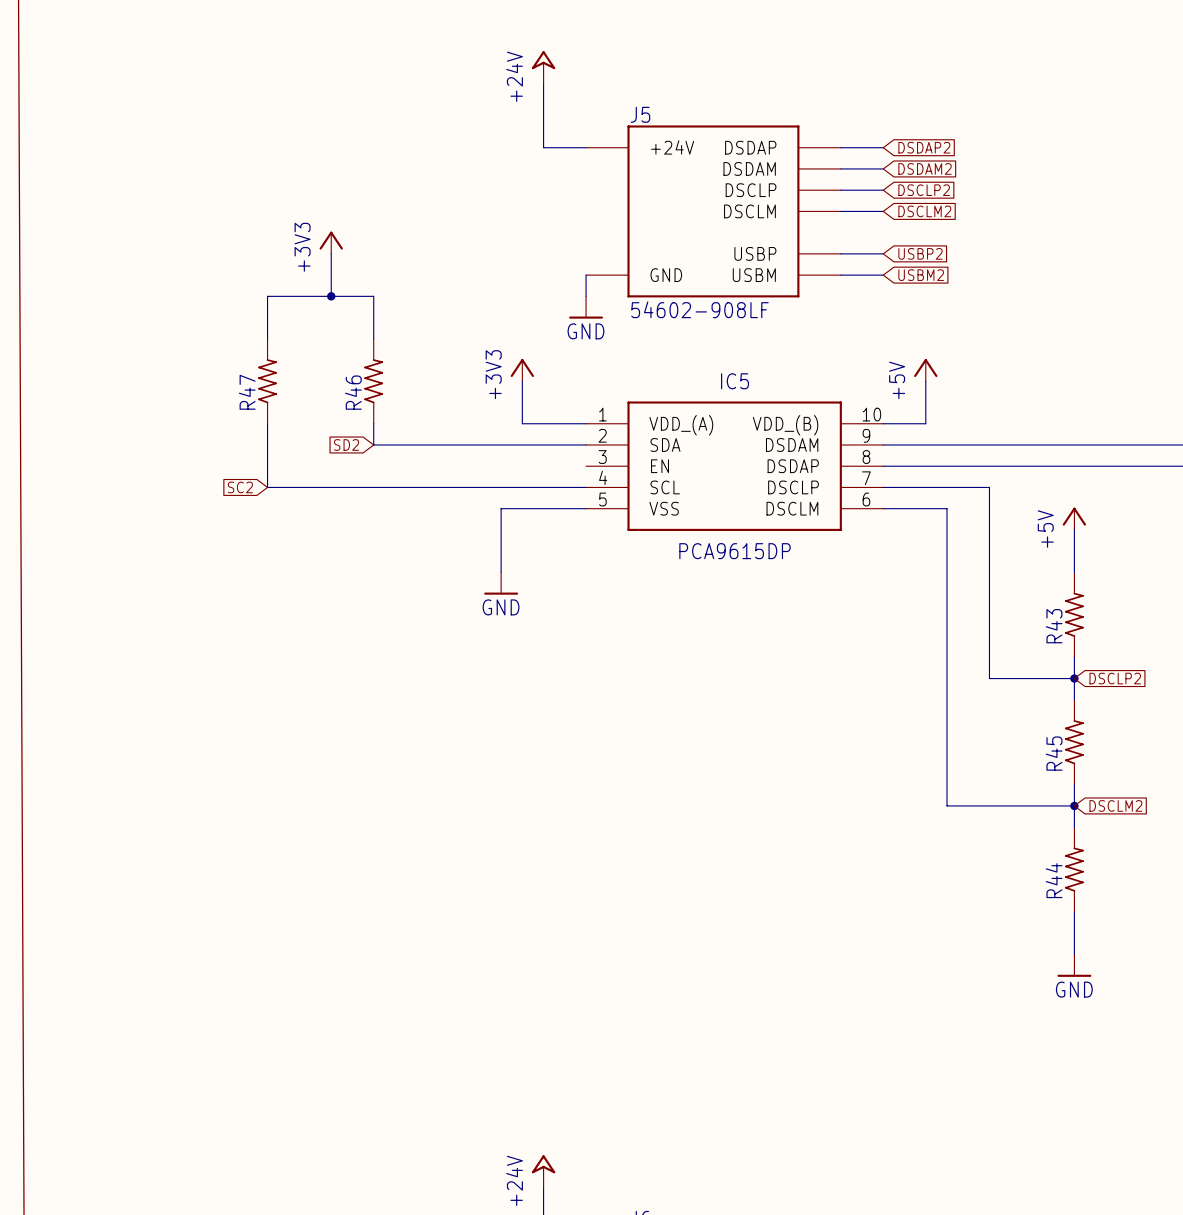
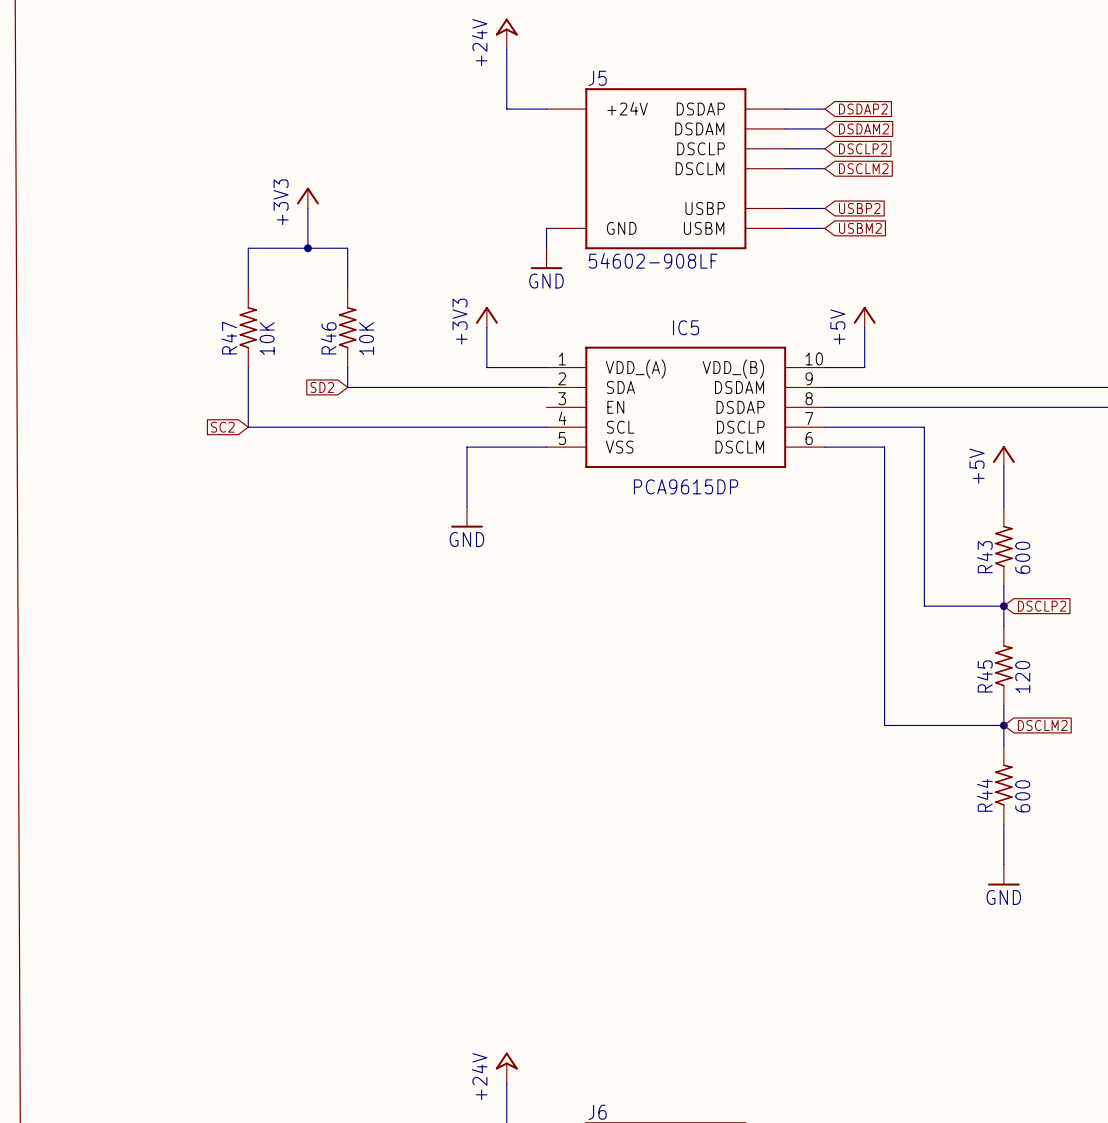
R47 value: none -> 10K (267, 338)
R46 value: none -> 10K (366, 338)
R43 value: none -> 600 (1022, 557)
R45 value: none -> 120 (1022, 677)
R44 value: none -> 600 (1022, 796)

